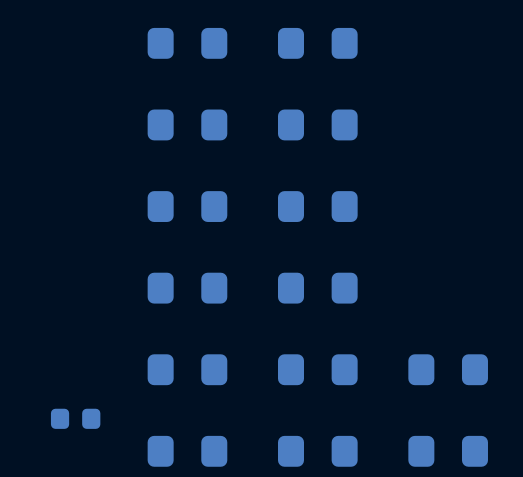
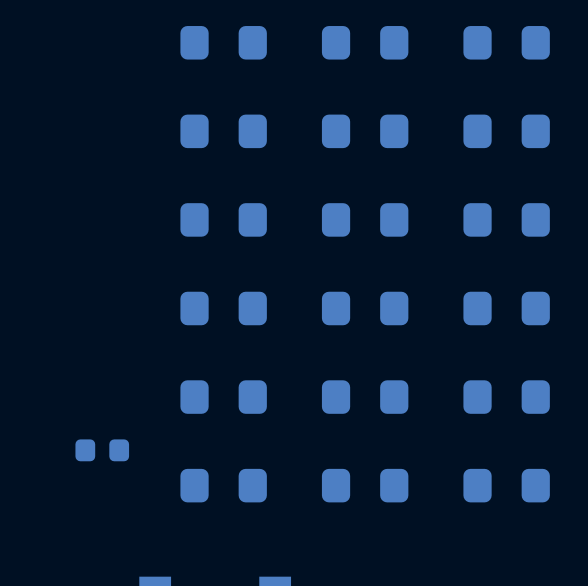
part: none -> (506, 42)
part: none -> (506, 131)
part: none -> (506, 219)
part: none -> (506, 308)

